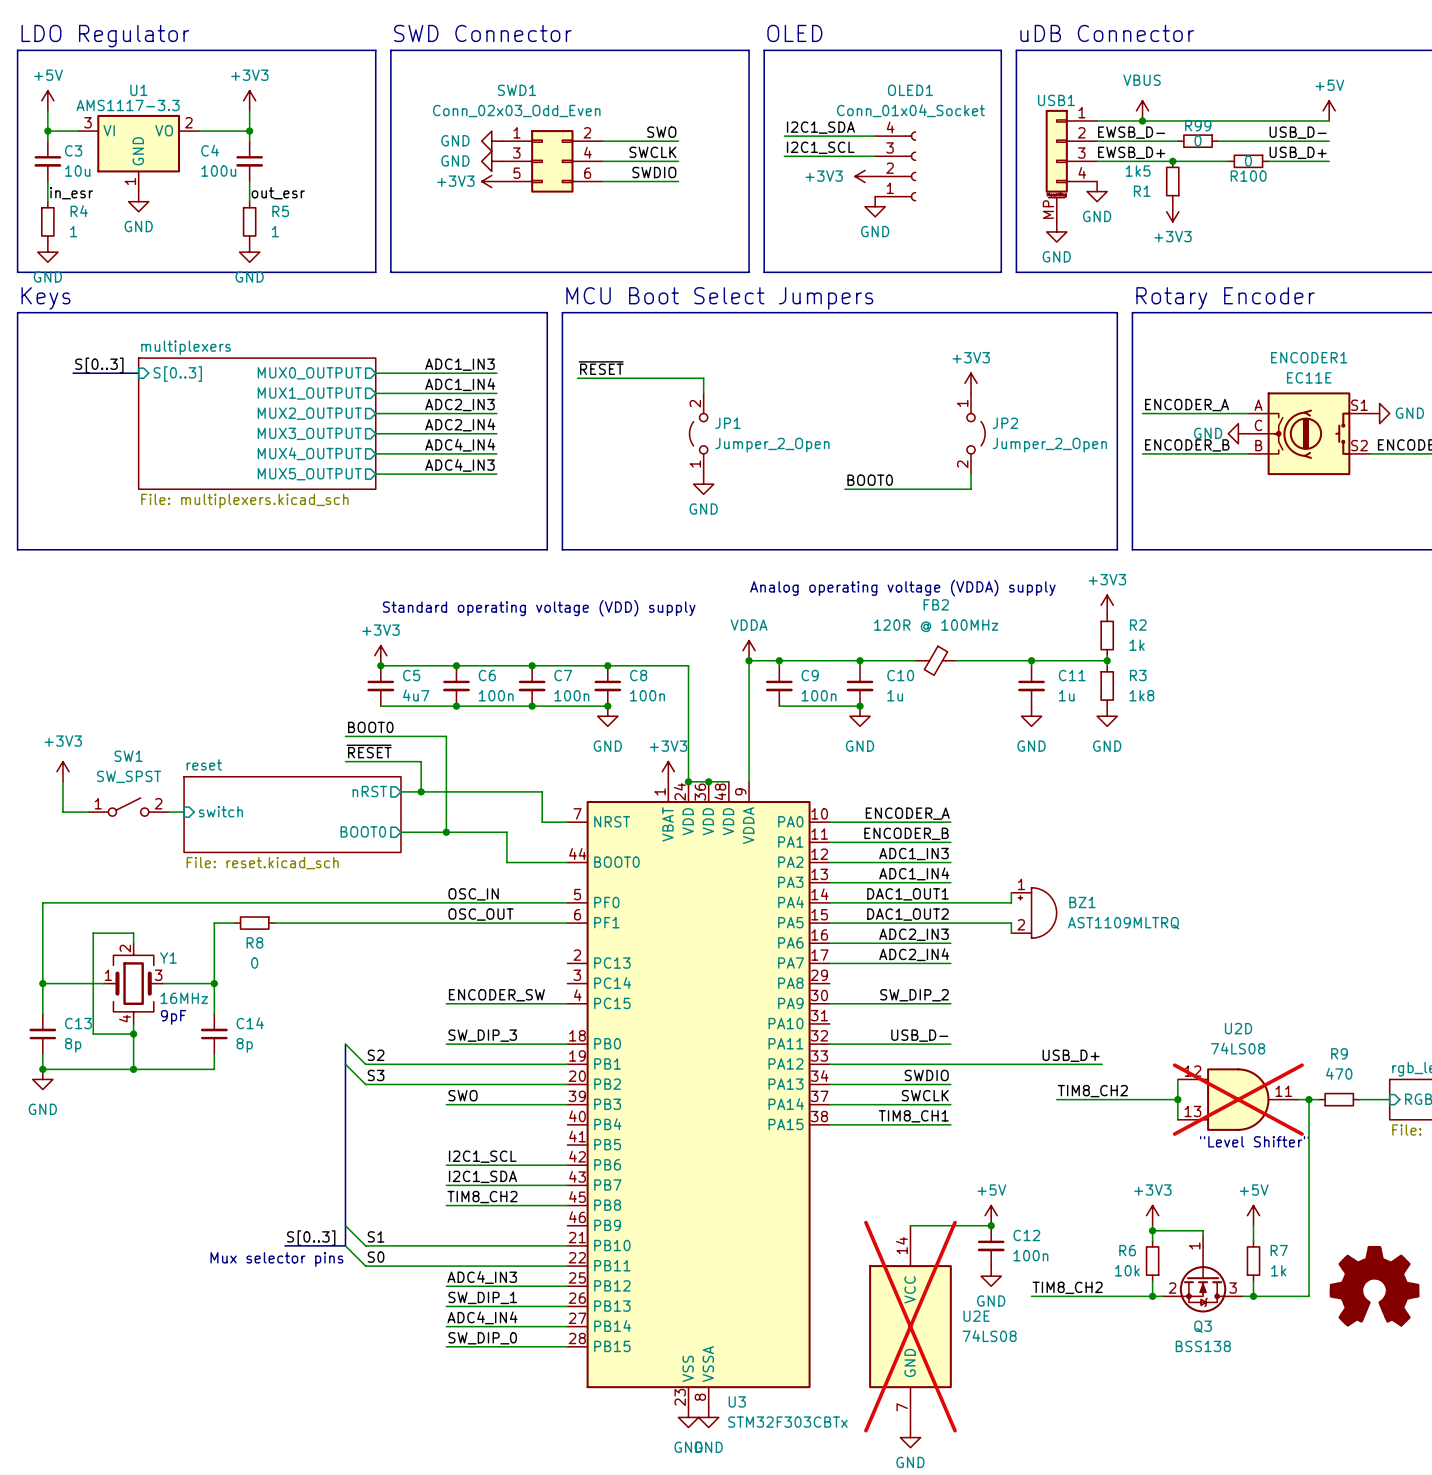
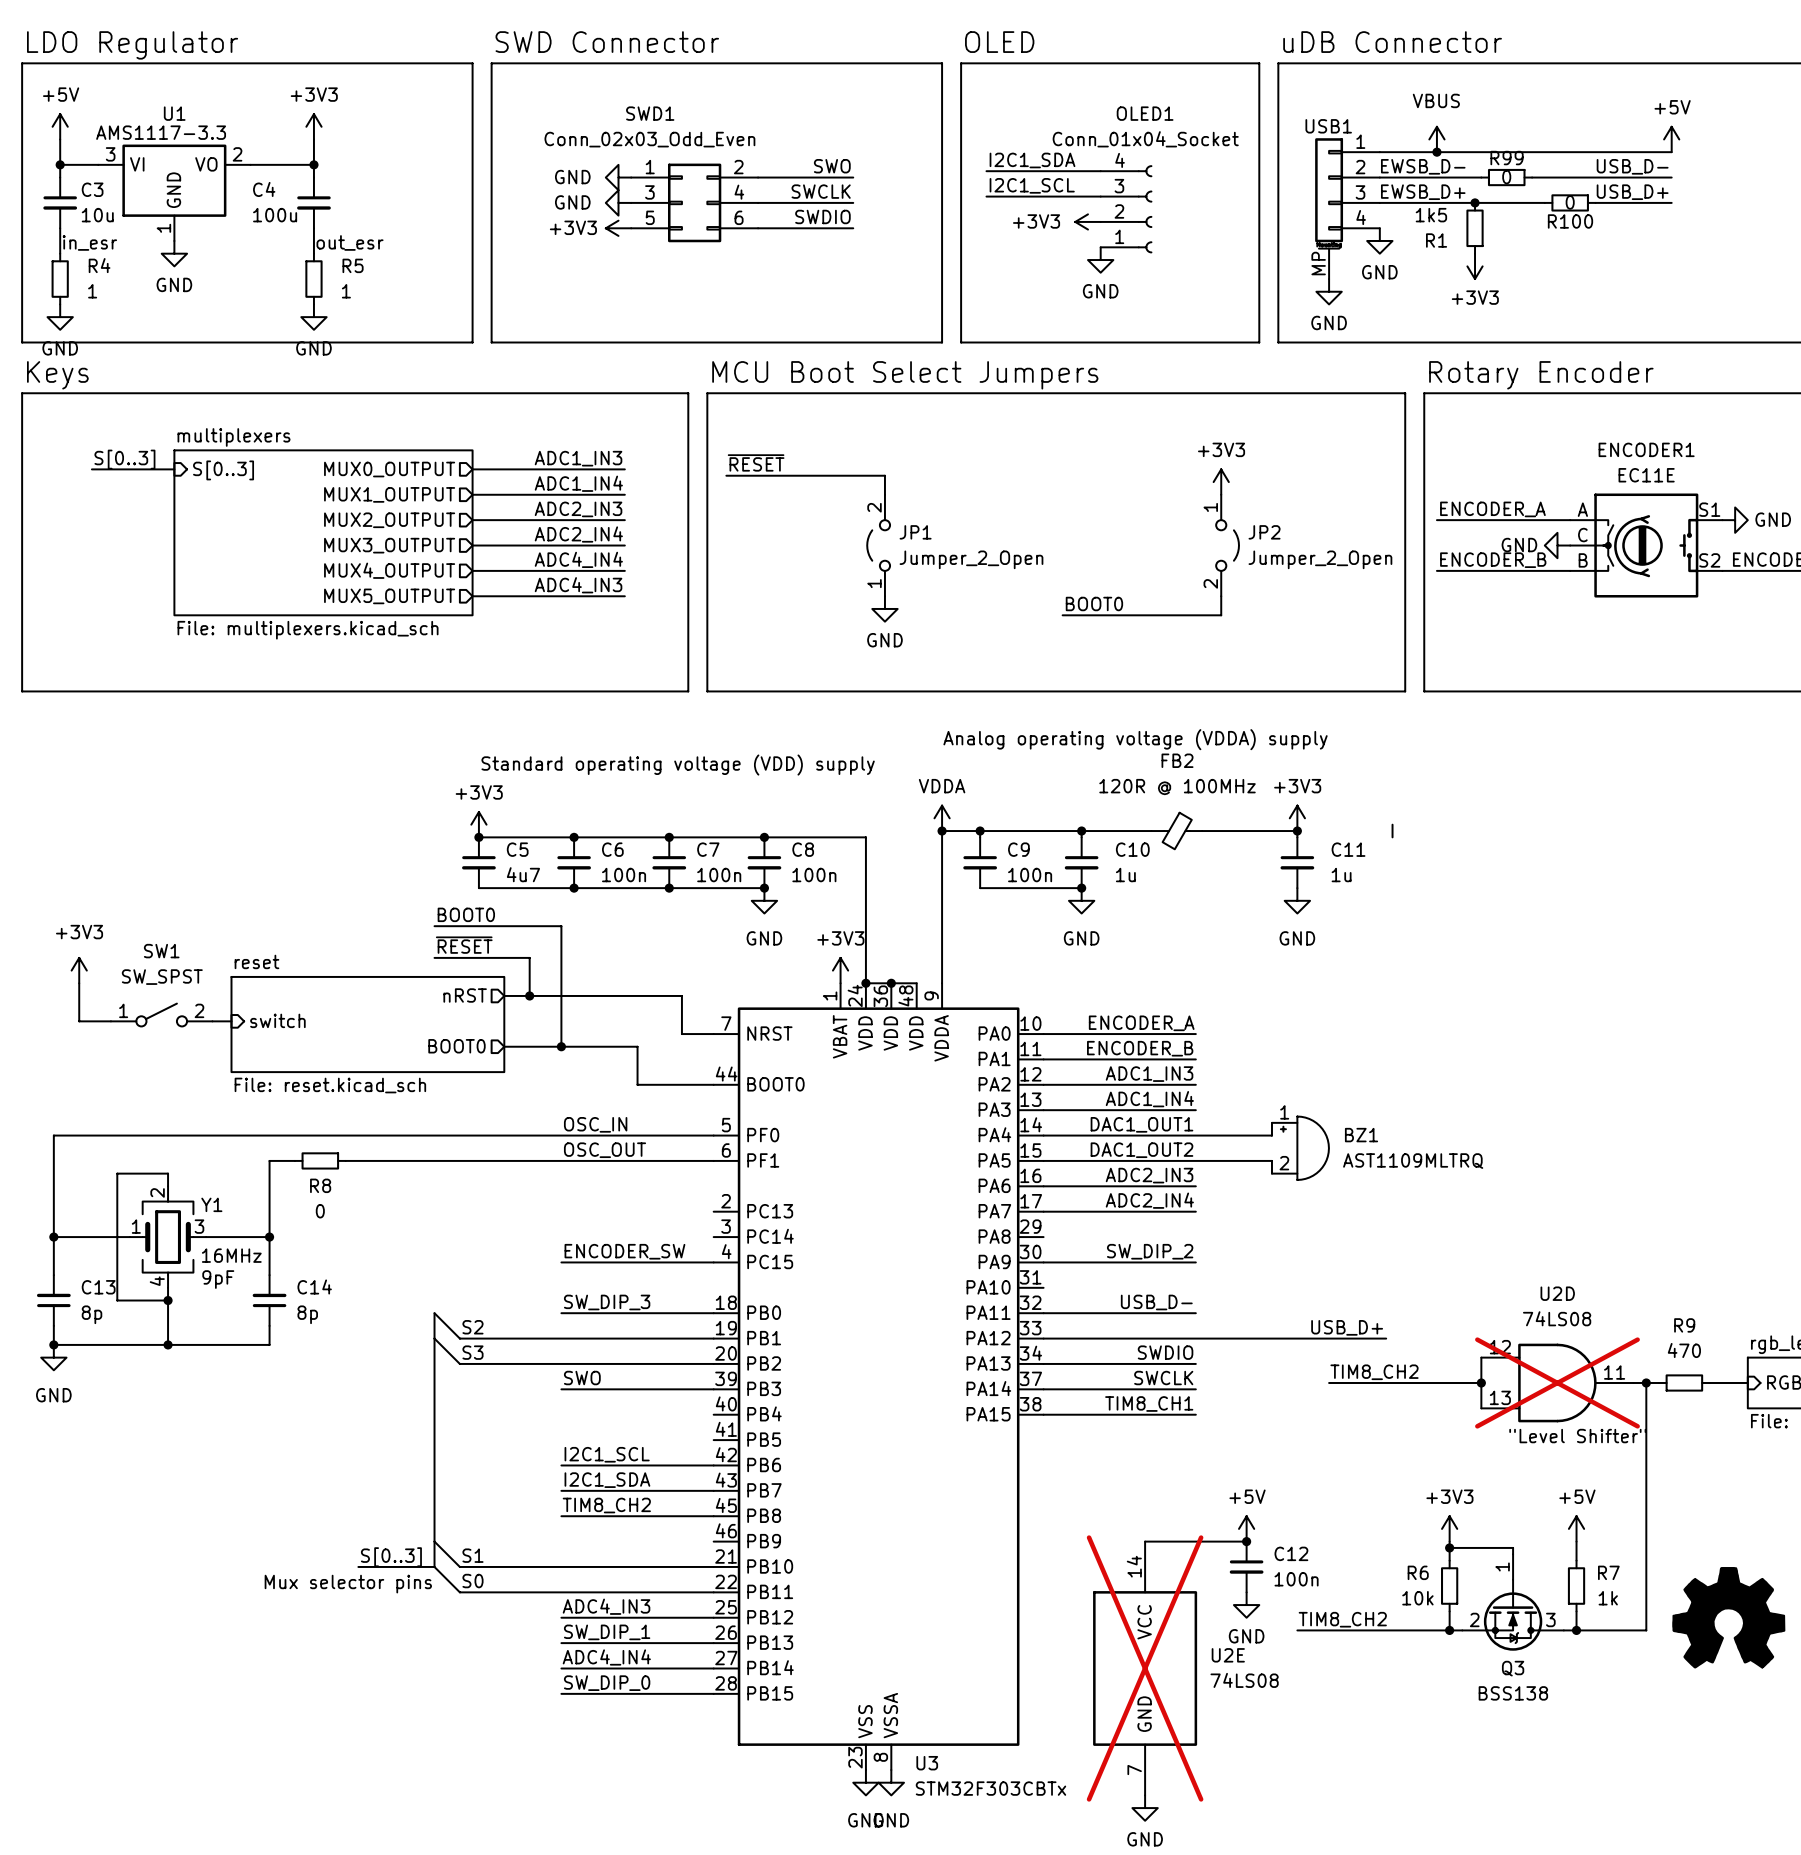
power symbol position: +3V3 (1107, 605) -> +3V3 (1297, 818)
R2: 1k (1107, 635) -> none
wire: (1031, 660) (1107, 660) -> none
junction: (1107, 660) -> none
R3: 1k8 (1107, 685) -> none
power symbol: GND (1107, 716) -> none

